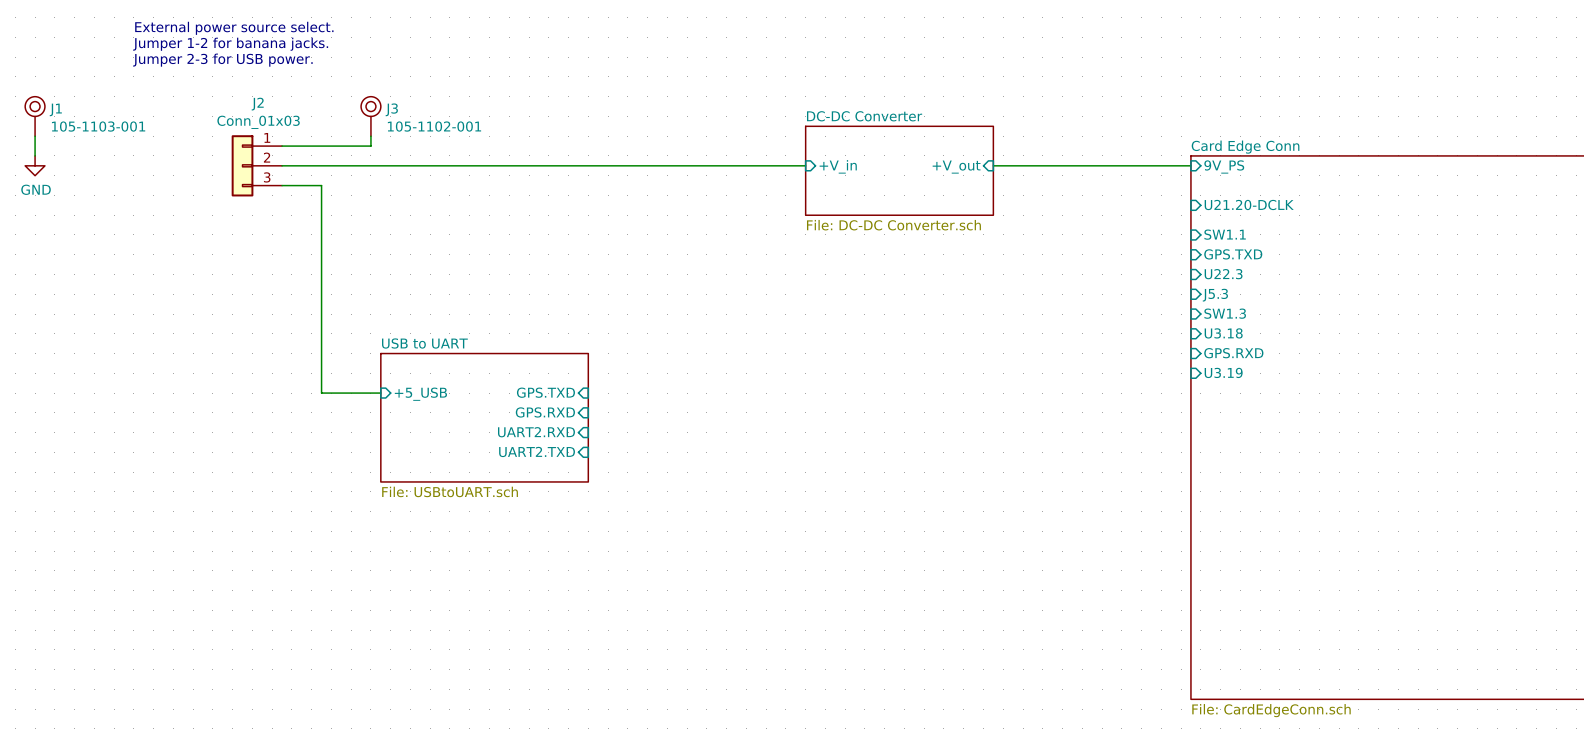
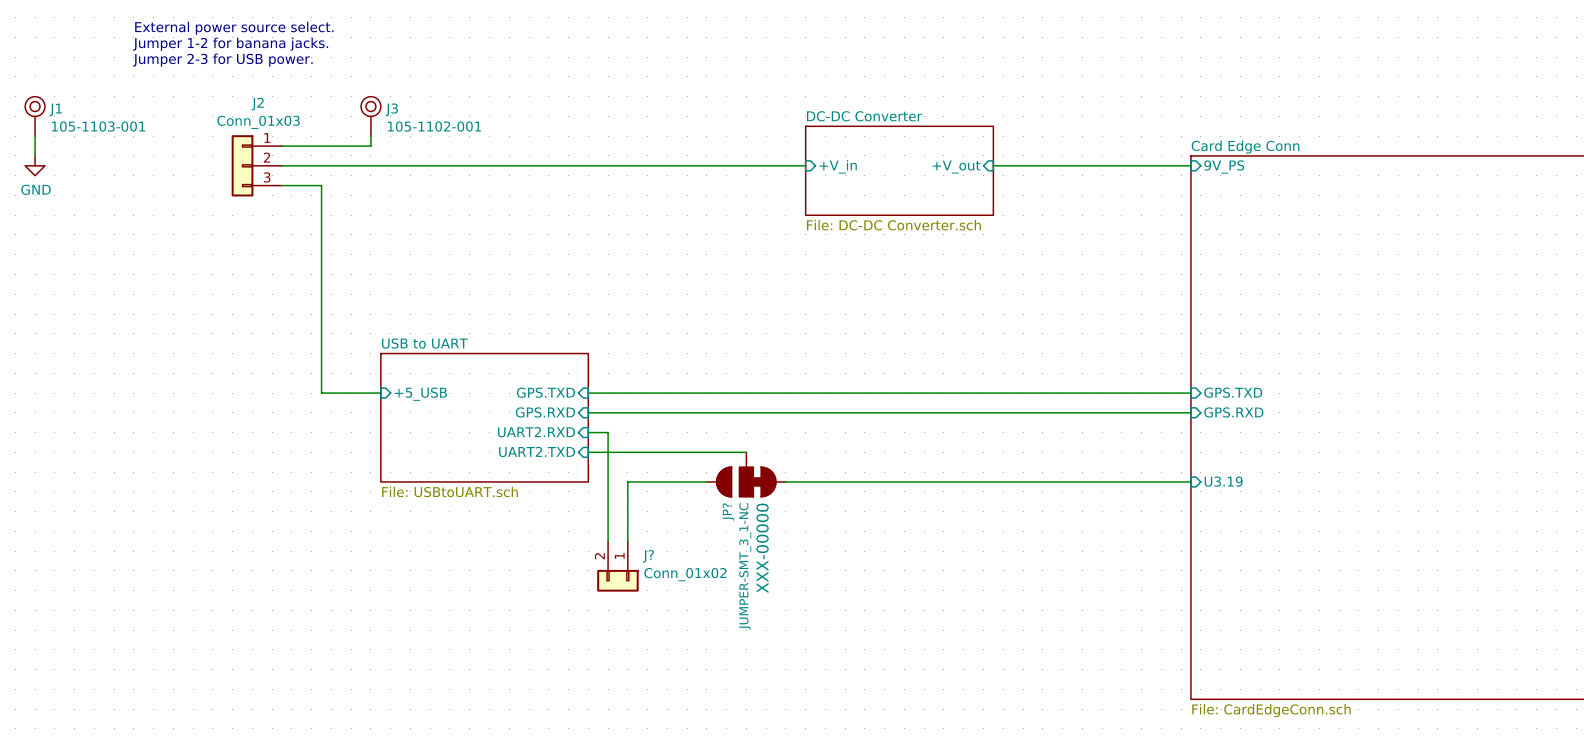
sheet pin: U21.20-DCLK (1249, 204) -> none
sheet pin: SW1.1 (1225, 234) -> none
sheet pin position: GPS.TXD (1233, 254) -> GPS.TXD (1233, 392)
sheet pin: U22.3 (1223, 274) -> none
sheet pin: J5.3 (1215, 295) -> none
sheet pin: SW1.3 (1225, 313) -> none
sheet pin: U3.18 (1223, 333) -> none
sheet pin position: GPS.RXD (1233, 353) -> GPS.RXD (1233, 412)
sheet pin position: U3.19 (1223, 372) -> U3.19 (1223, 481)
wire: none -> (588, 393) (1190, 393)
wire: none -> (588, 412) (1190, 412)
wire: none -> (588, 432) (608, 432) (608, 541)
wire: none -> (588, 452) (746, 452)
JP?: none -> JUMPER-SMT_3_1-NC (746, 474)
wire: none -> (706, 481) (627, 481) (627, 541)
wire: none -> (785, 481) (1190, 481)
J?: none -> Conn_01x02 (617, 566)

